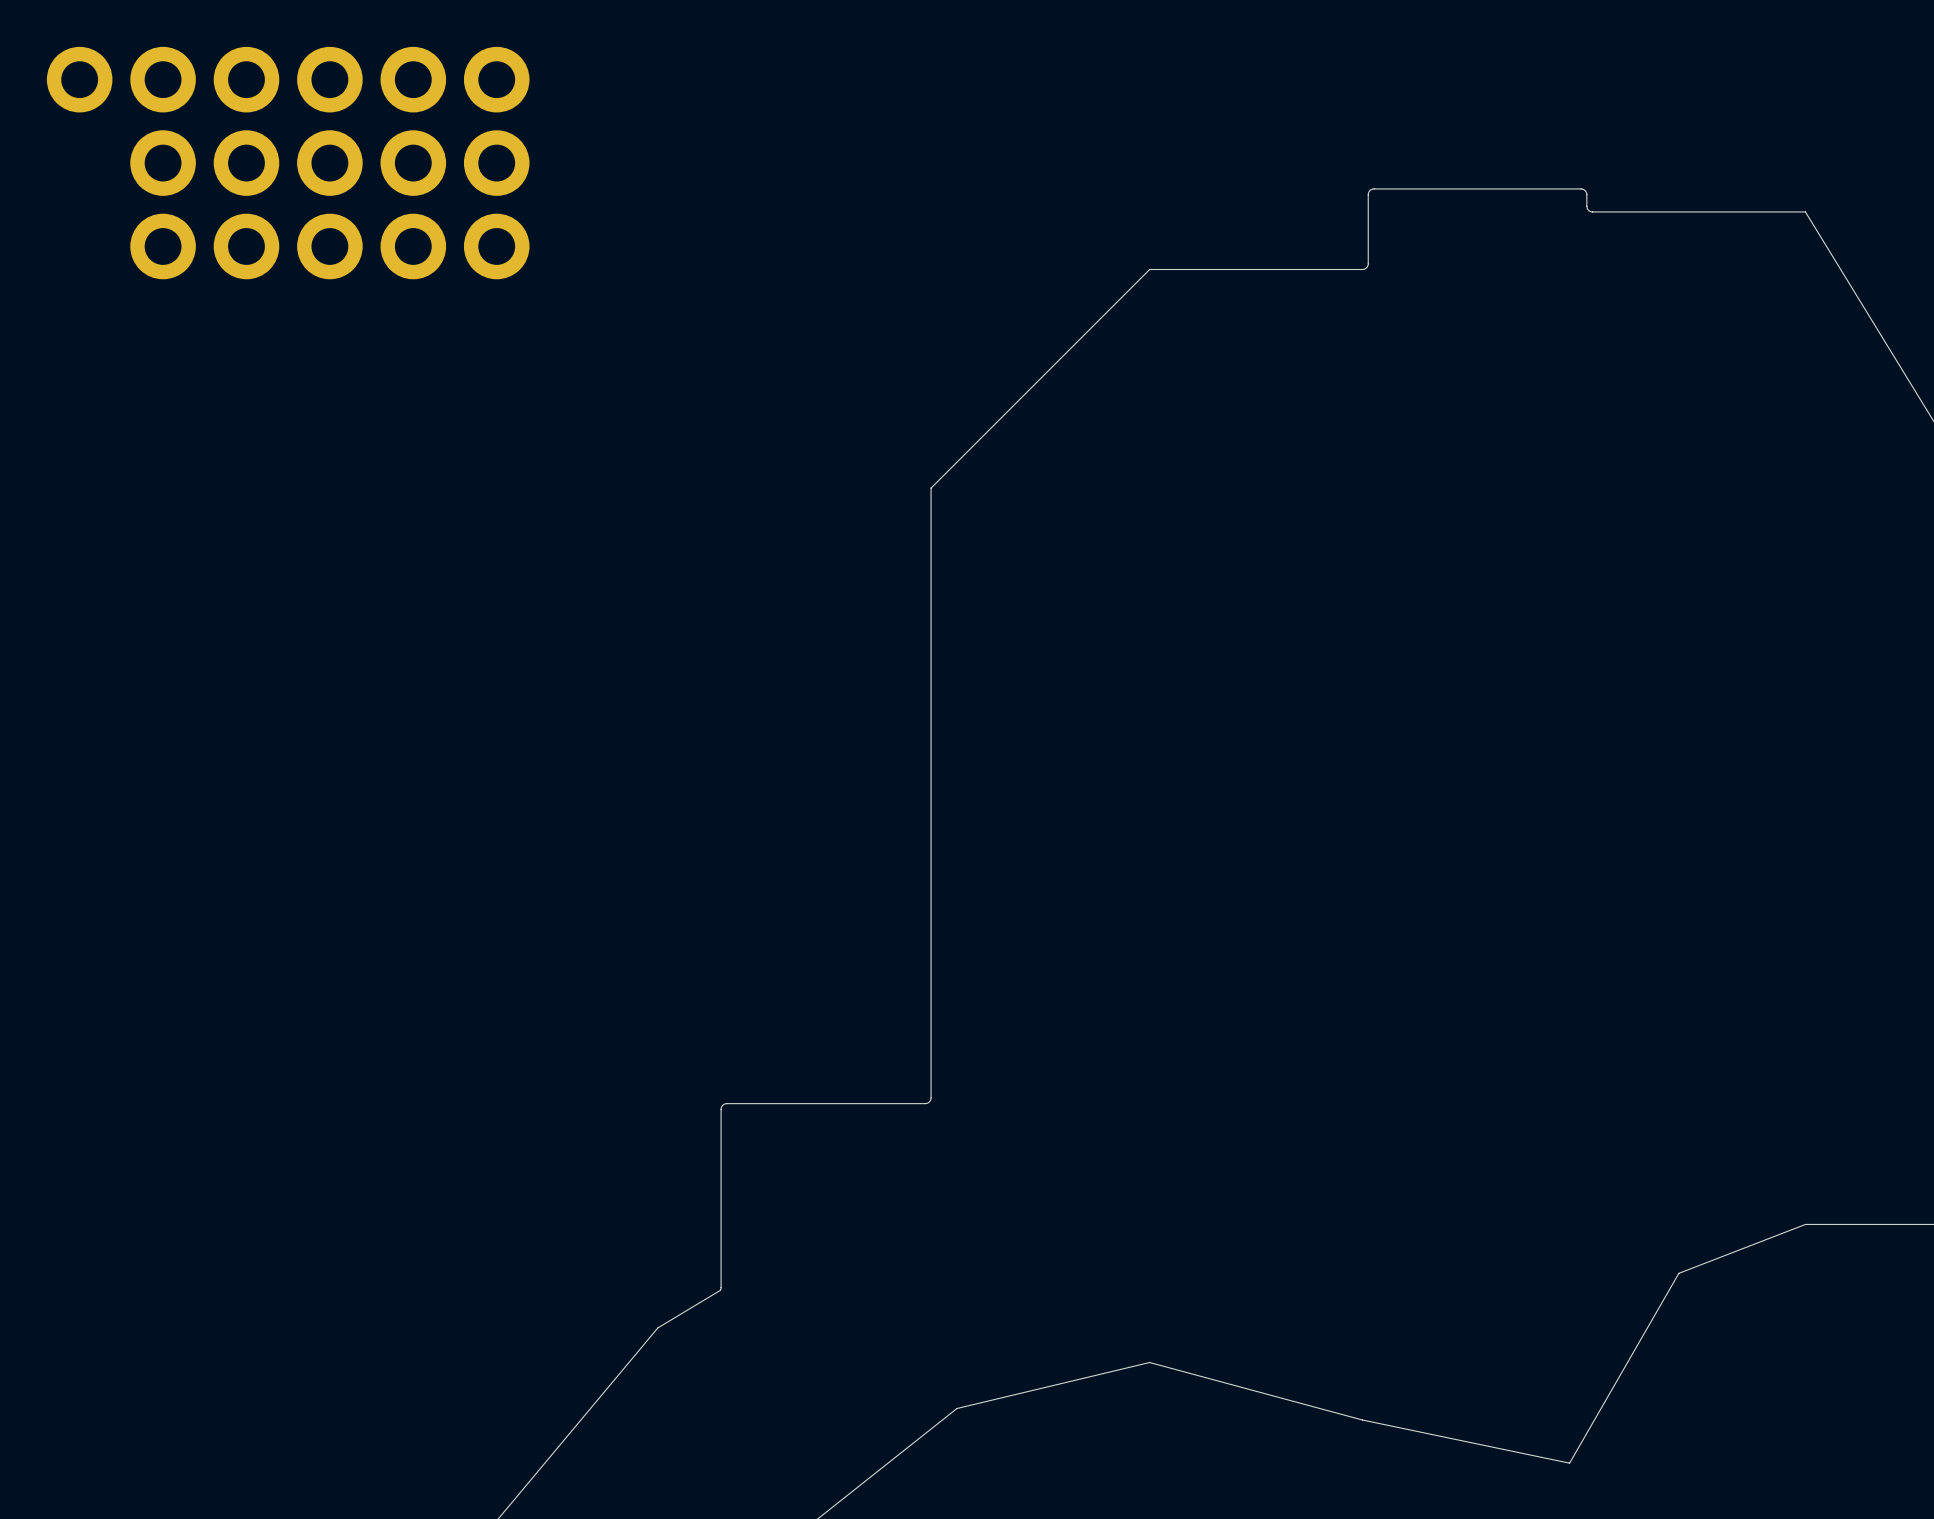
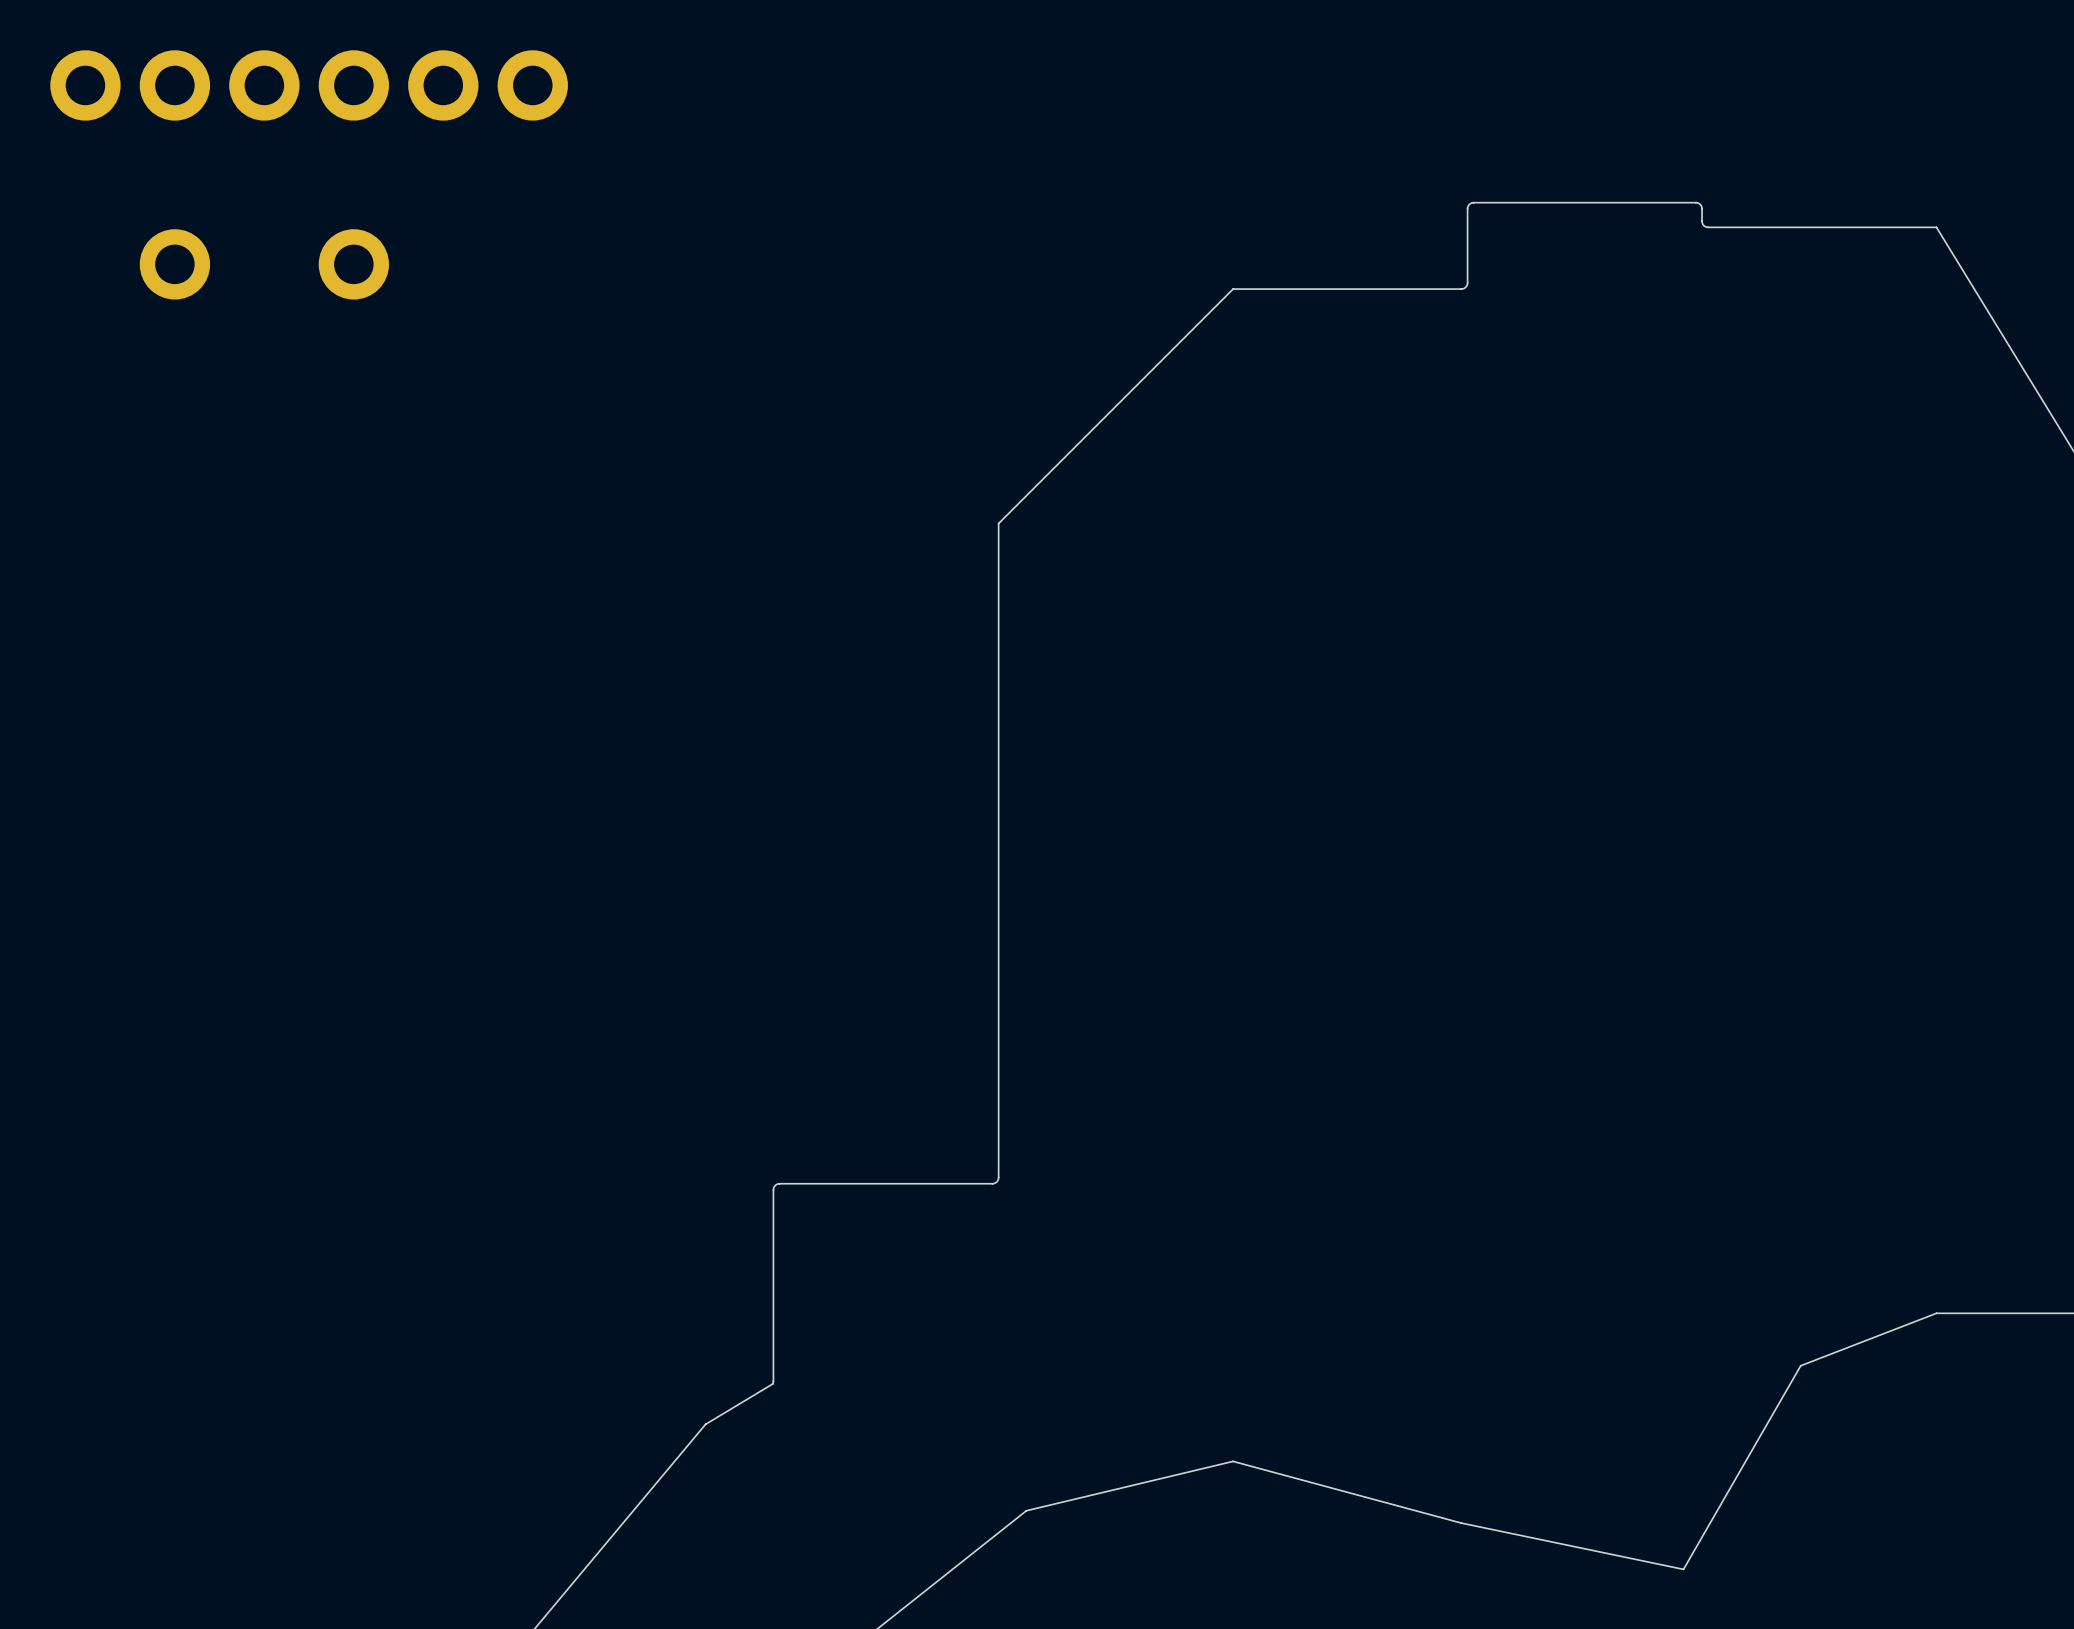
part: (163, 163) -> none
part: (246, 163) -> none
part: (329, 163) -> none
part: (413, 163) -> none
part: (496, 163) -> none
part: (246, 246) -> none
part: (413, 246) -> none
part: (496, 246) -> none

